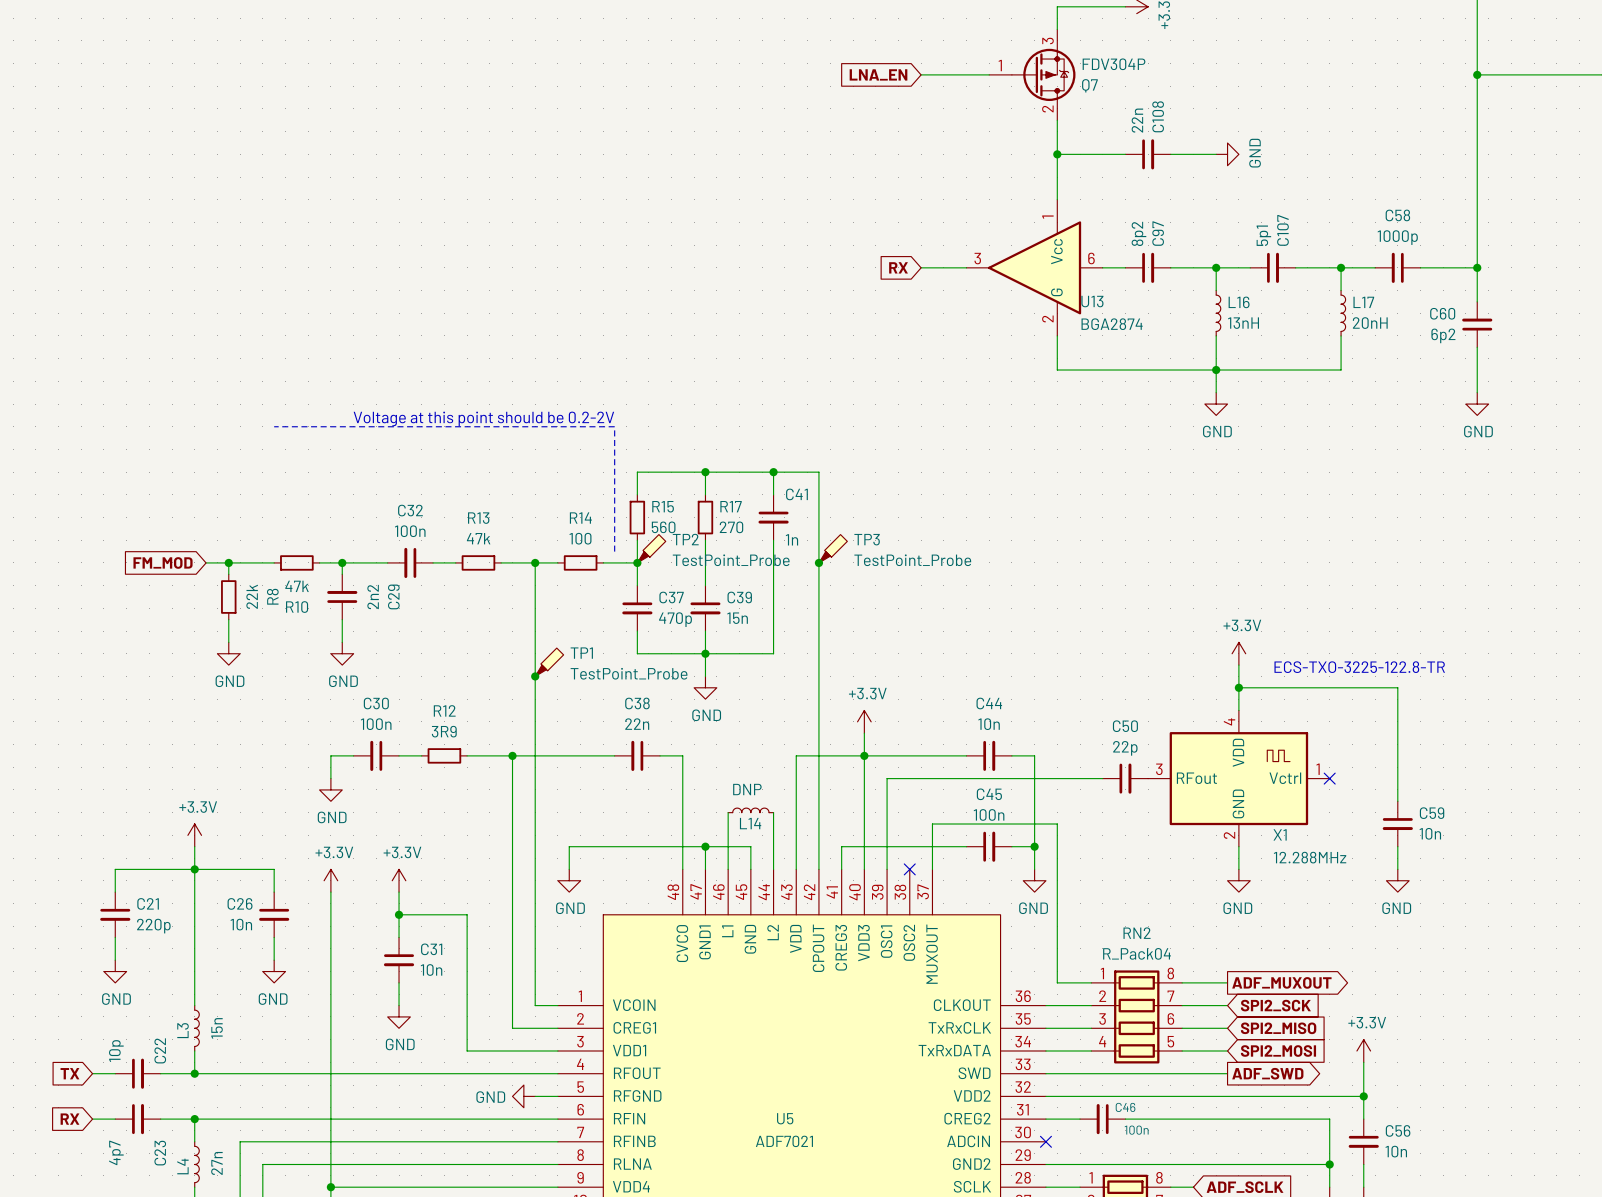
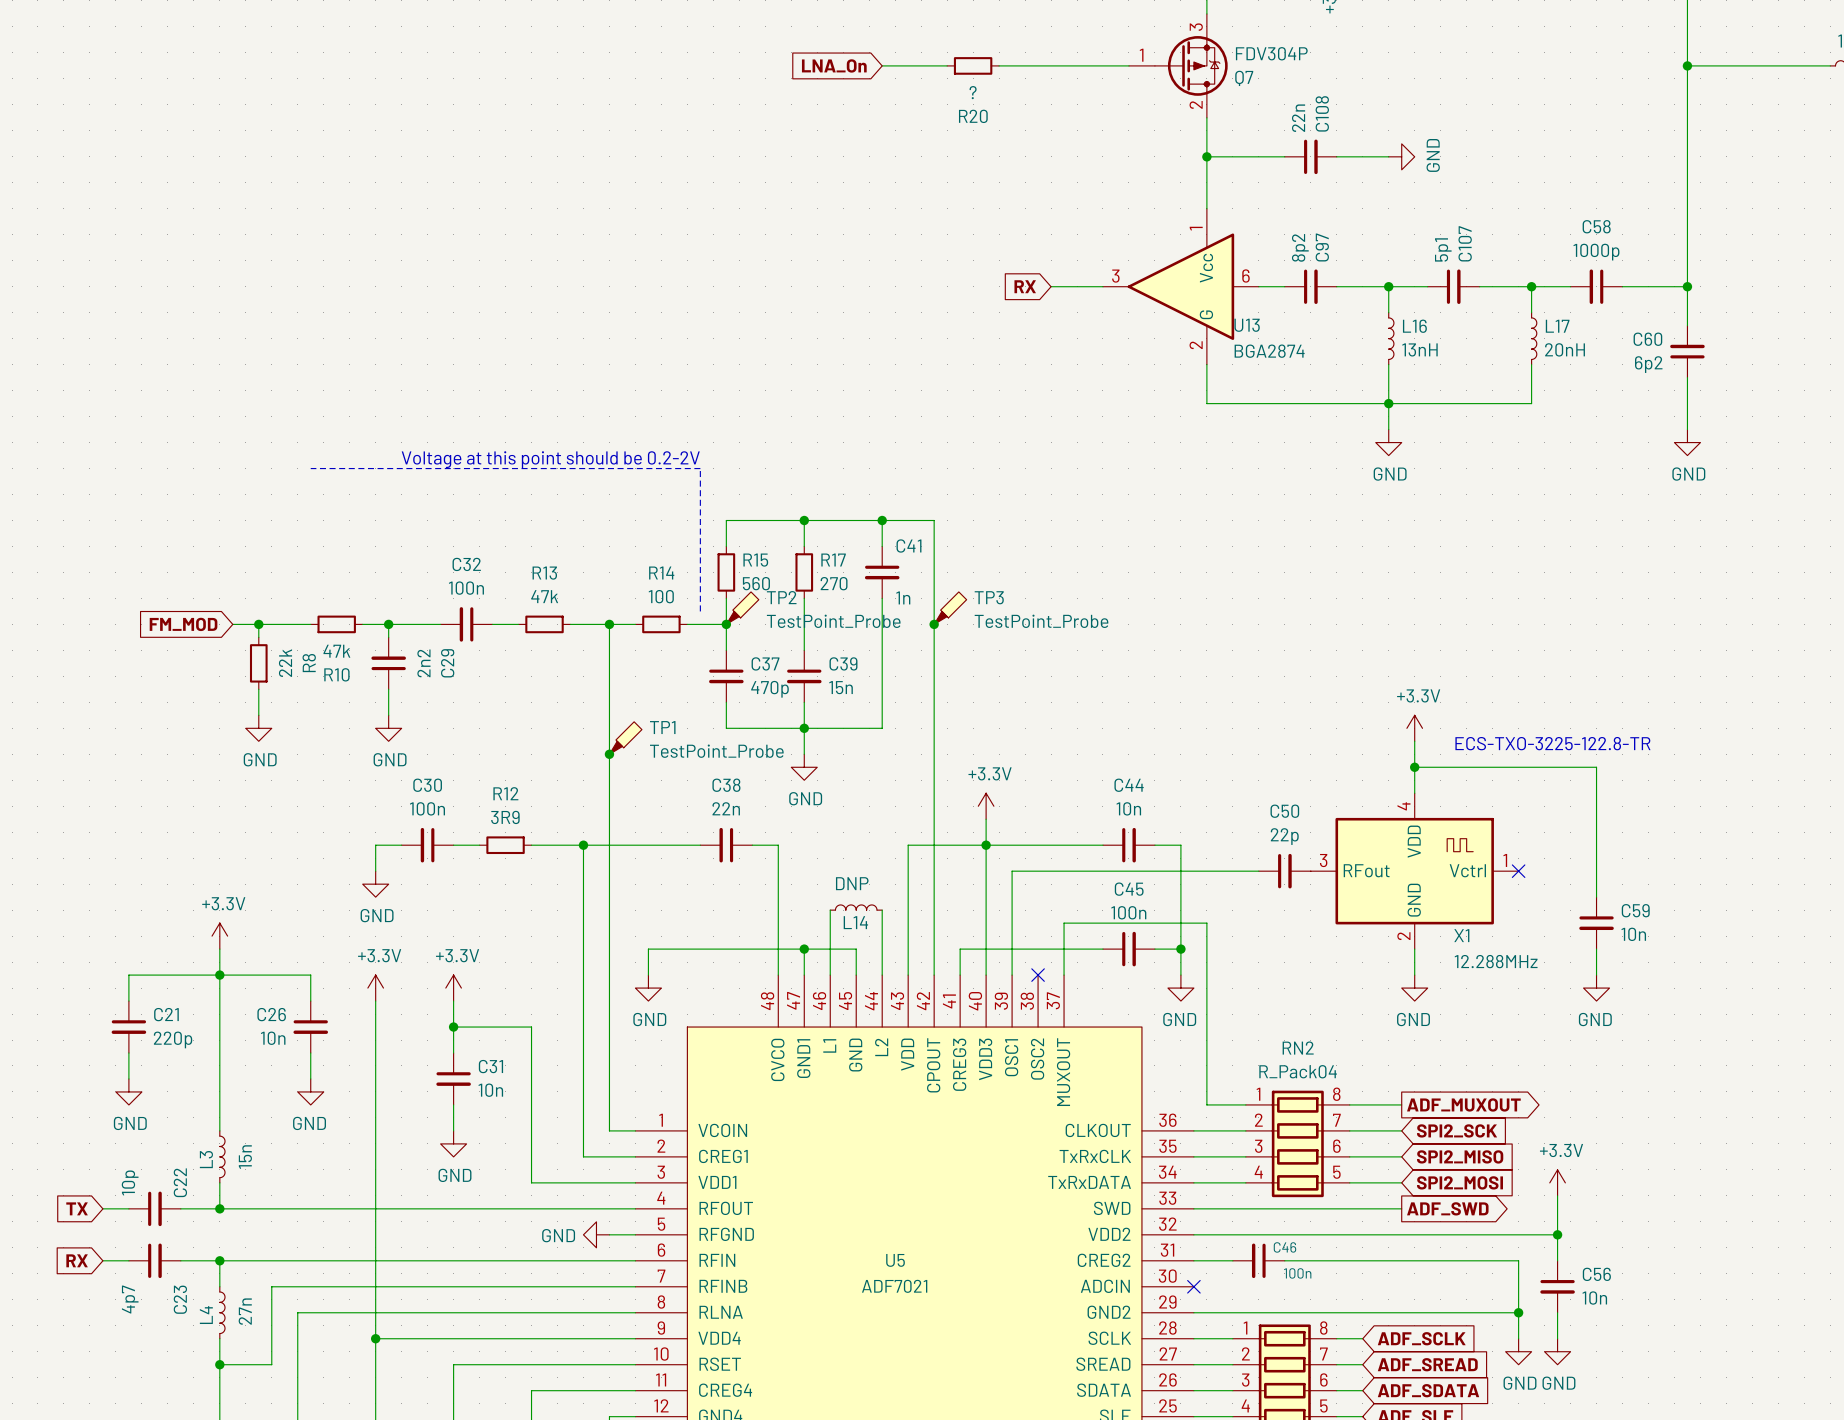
global label: none -> LNA_On (834, 65)
wire: none -> (882, 65) (947, 65)
R20: none -> ? (973, 65)
wire: none -> (999, 65) (1051, 65)
global label: LNA_EN (878, 74) -> none

